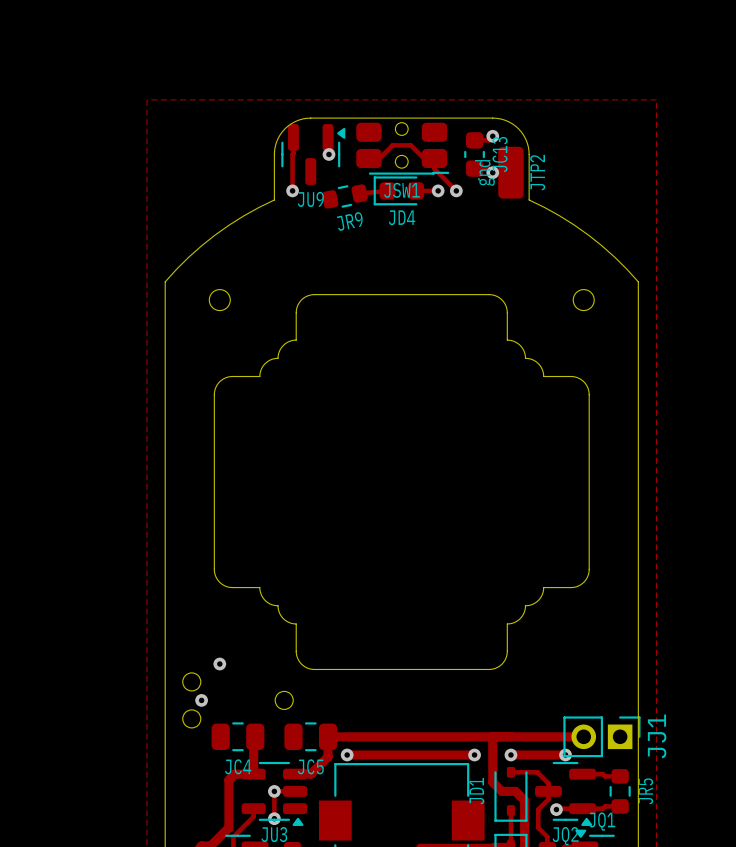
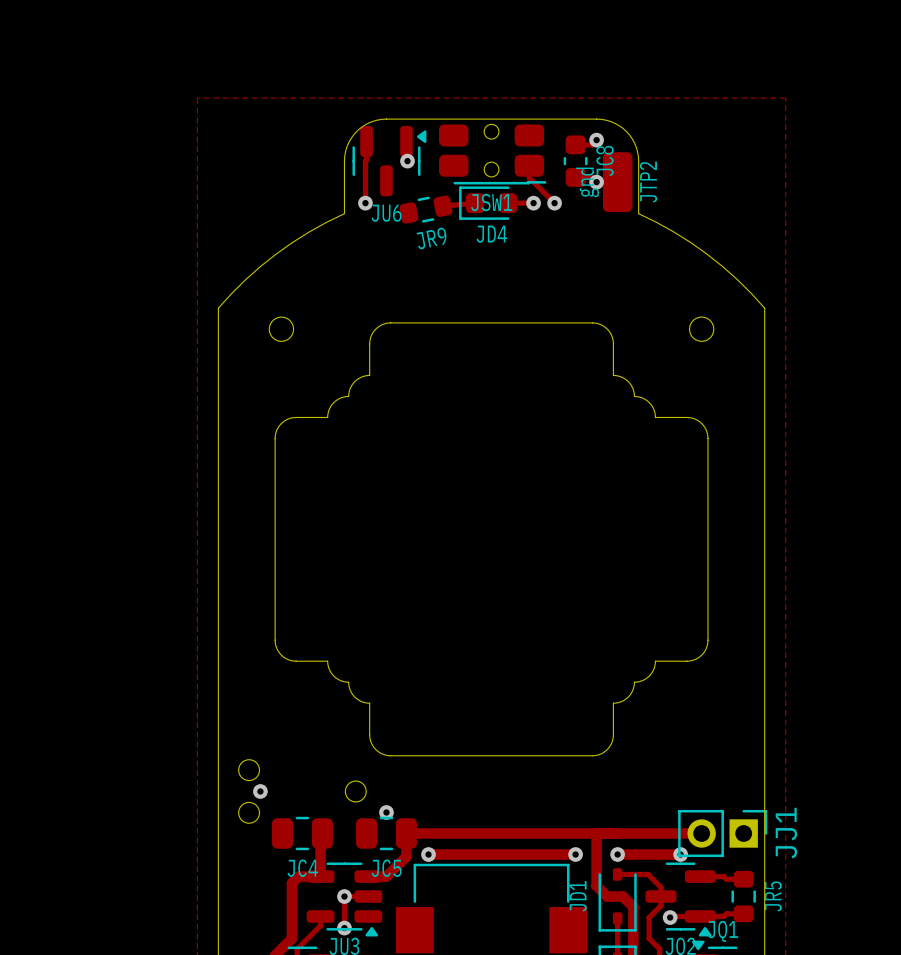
JC13 name: JC13 (500, 154) -> JC8 (605, 160)
track: (369, 158) (379, 158) (392, 145) (410, 145) (423, 158) (434, 158) -> none
JU9 name: JU9 (310, 199) -> JU6 (386, 213)
via position: (219, 664) -> (386, 812)

